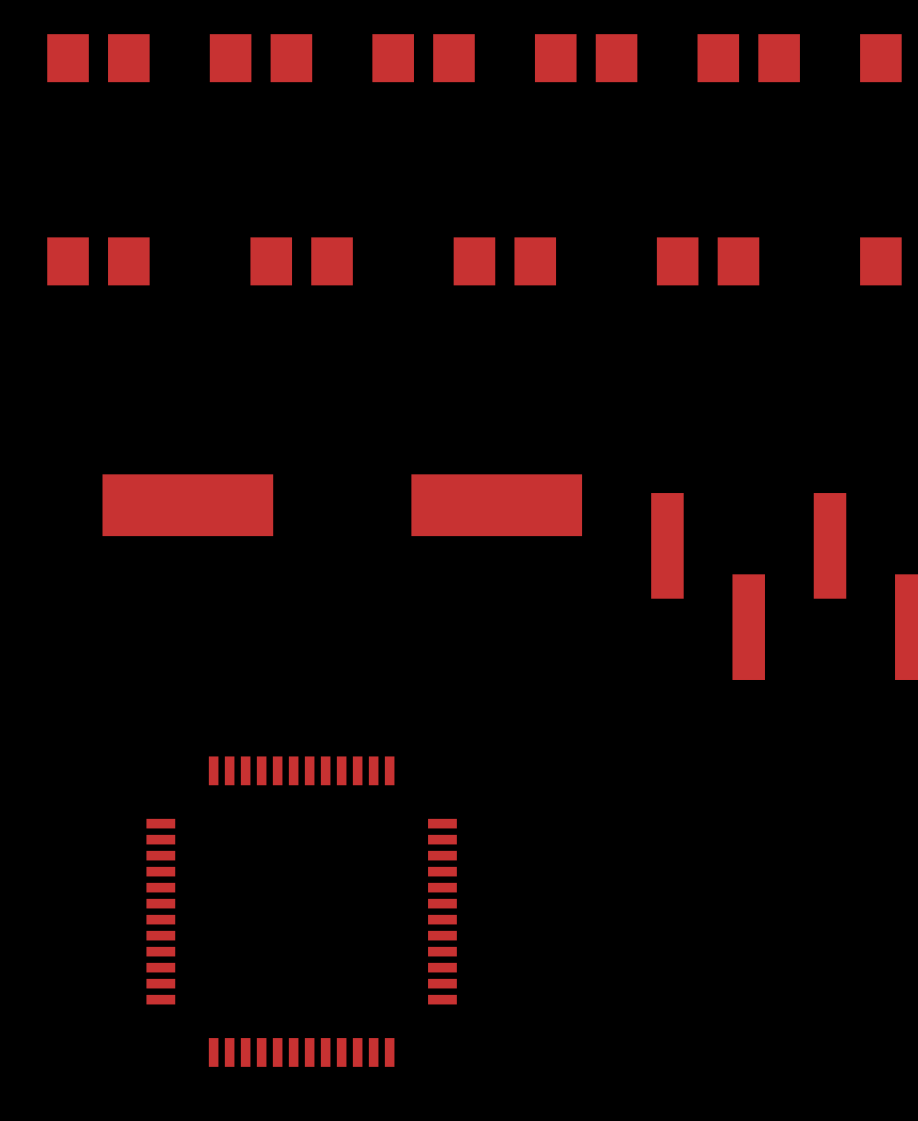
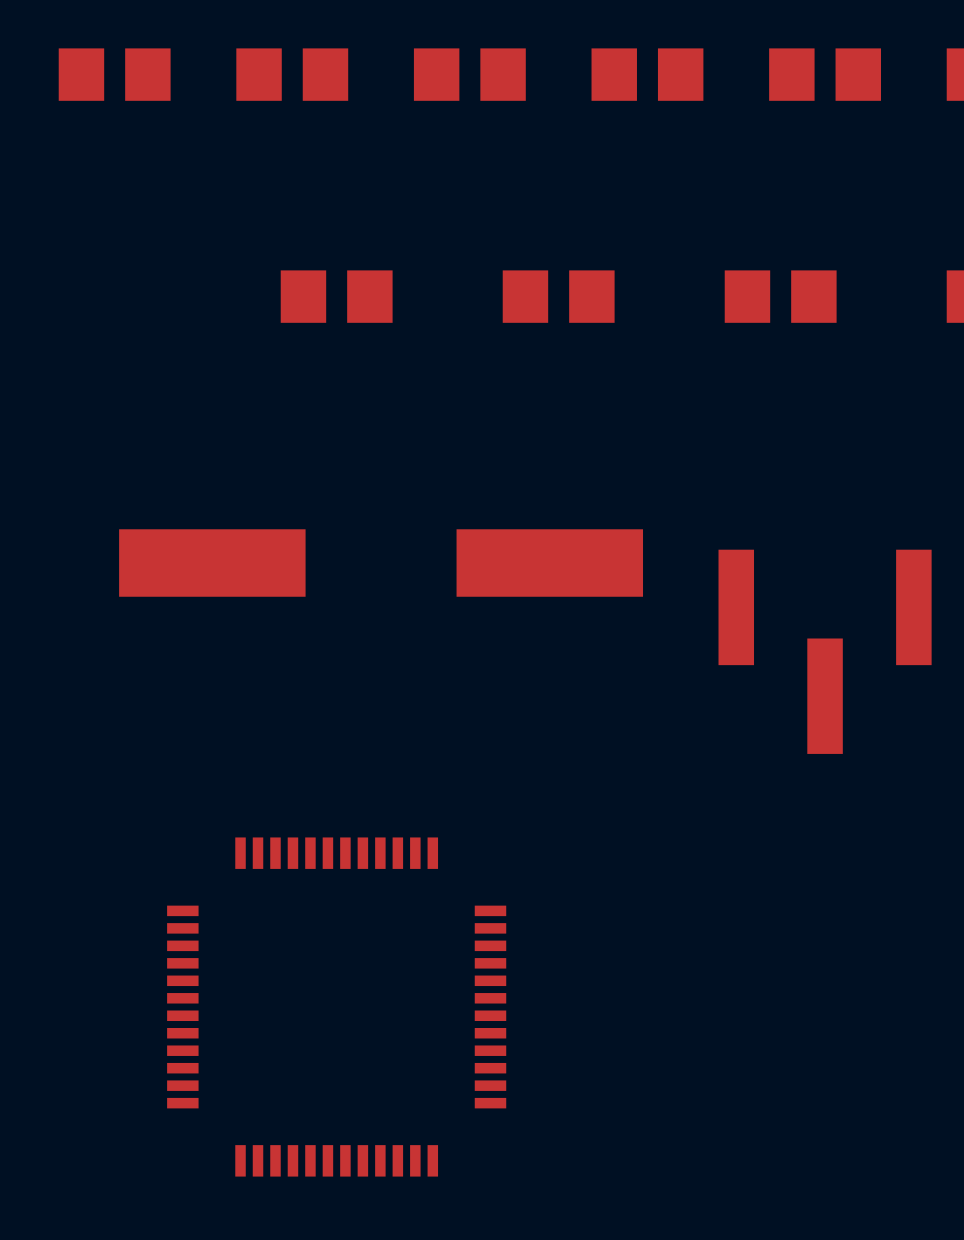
part: (98, 261) -> none

